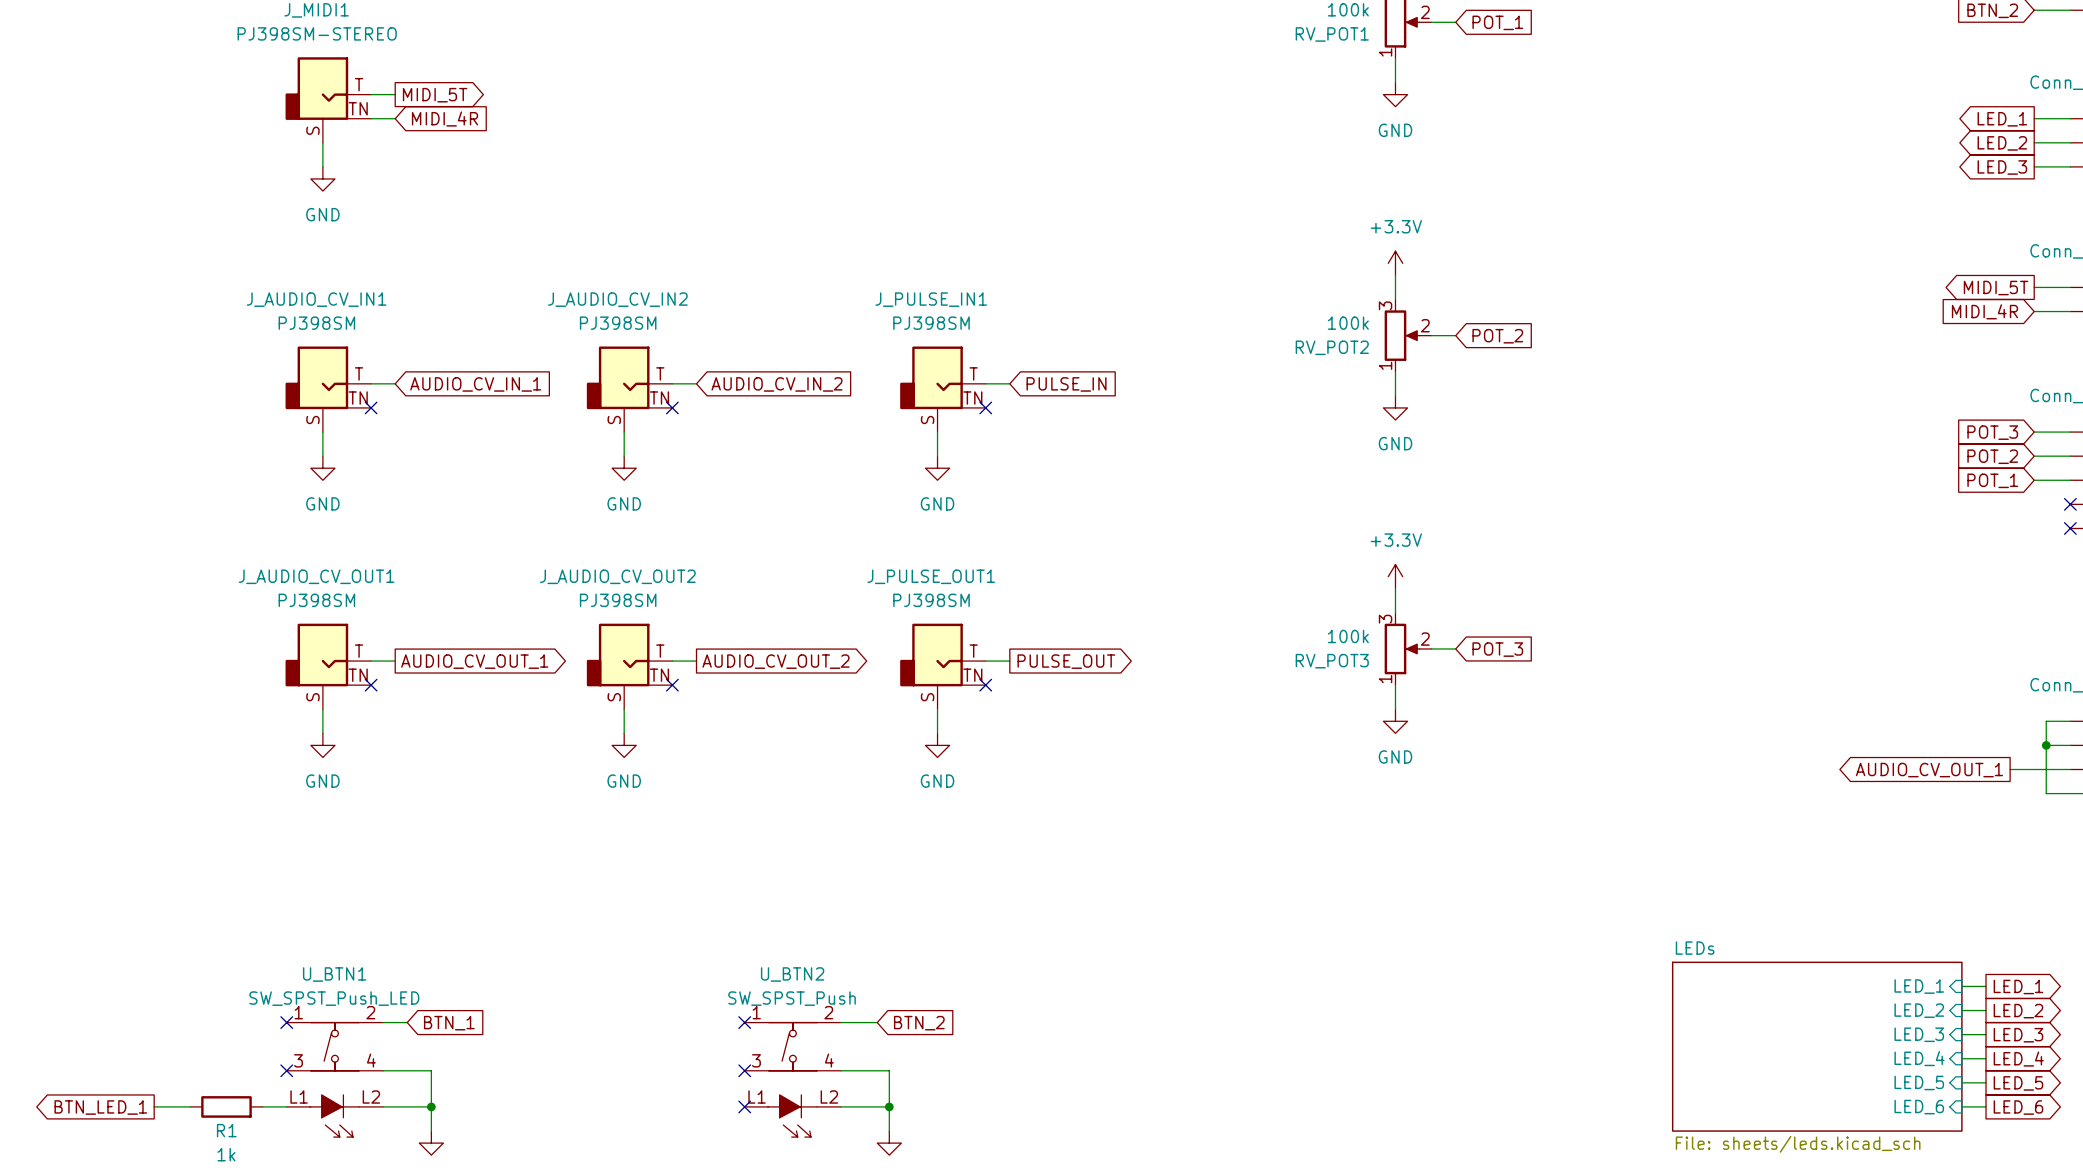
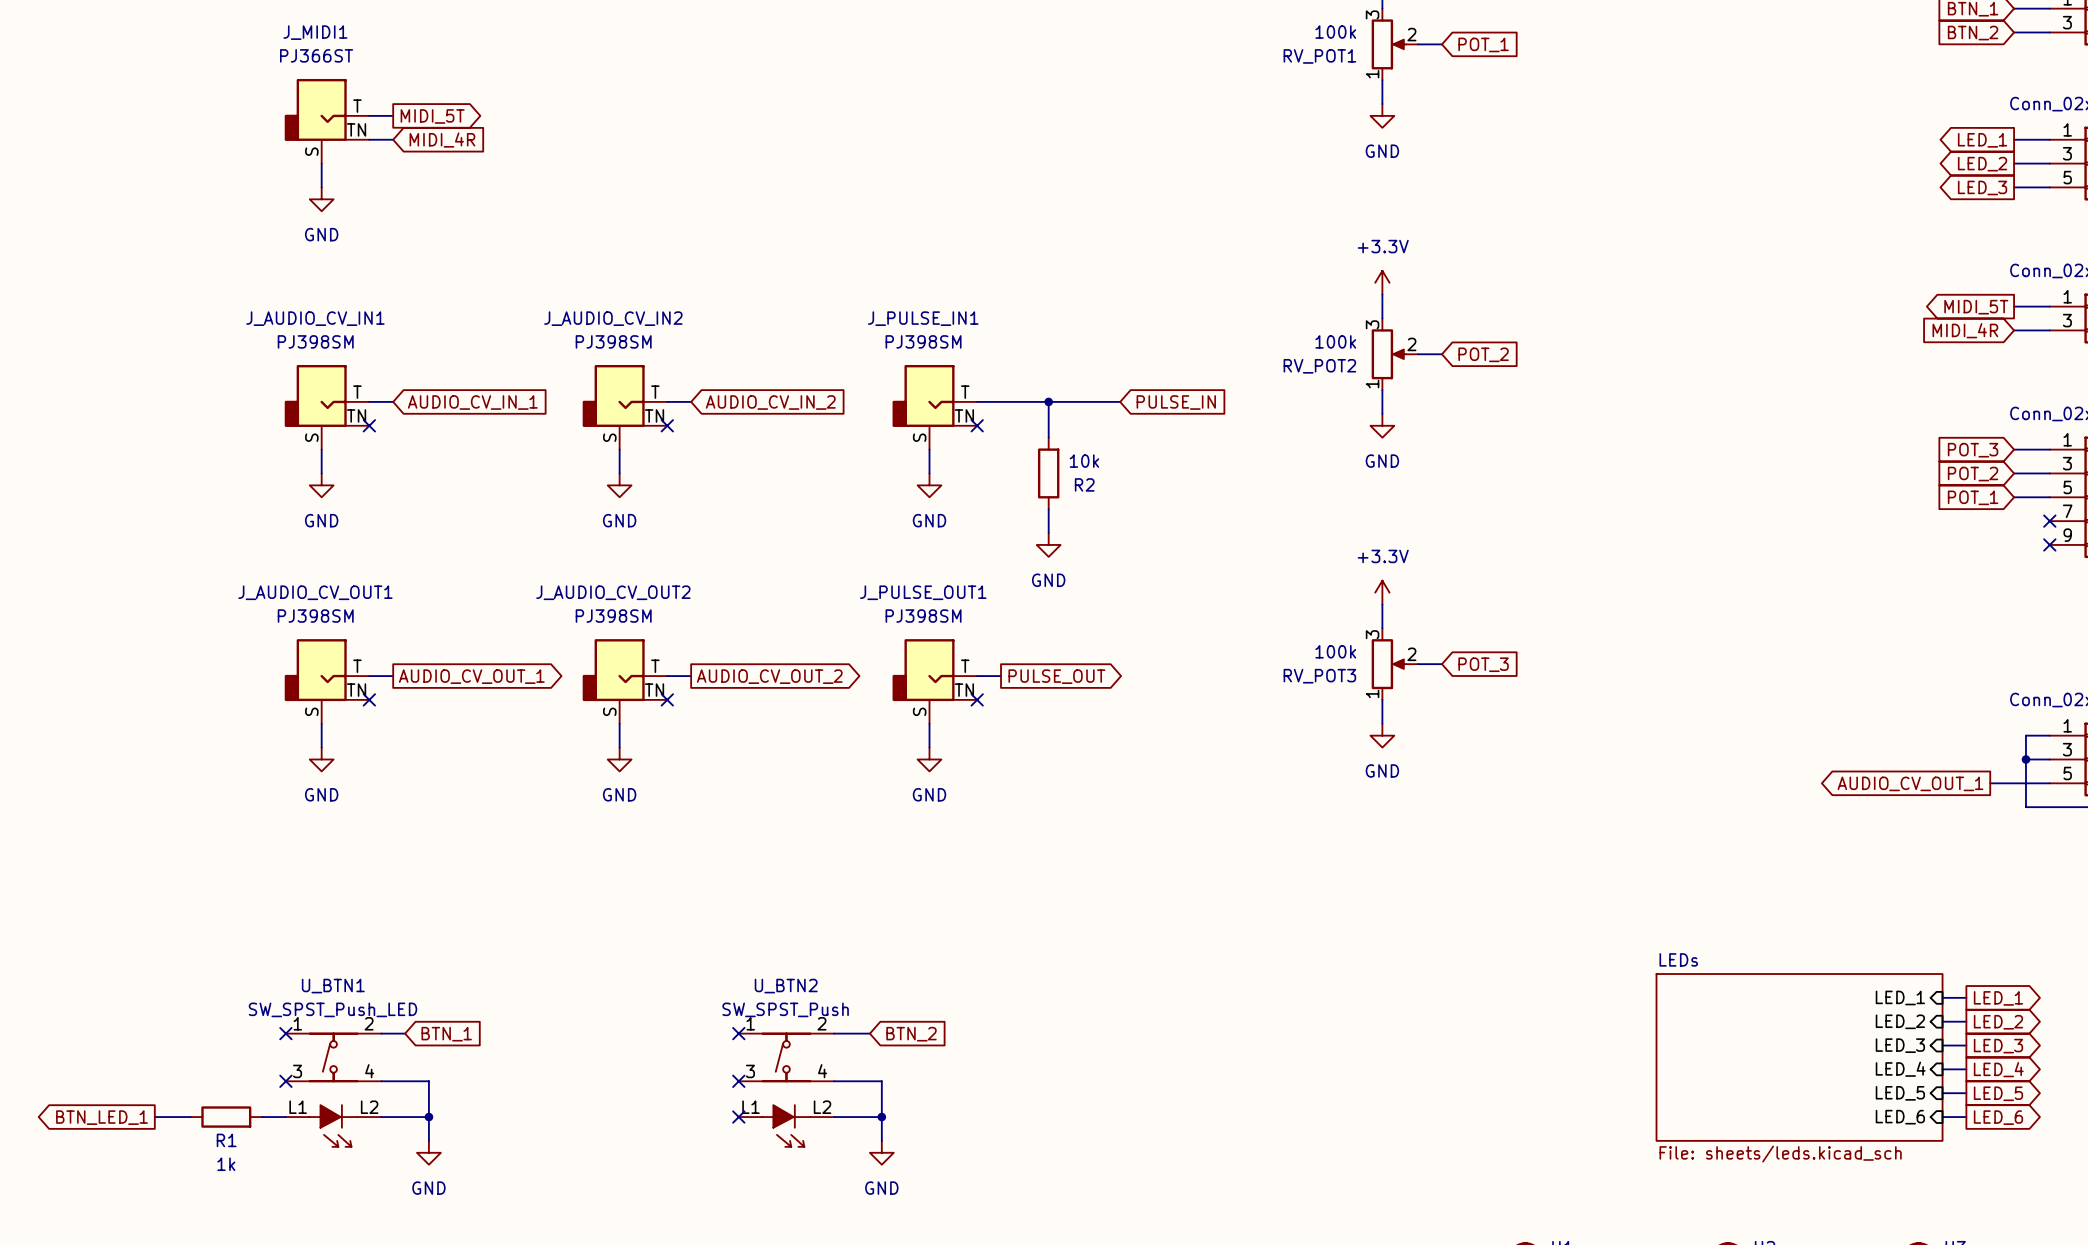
J_MIDI1 value: PJ398SM-STEREO (317, 33) -> PJ366ST (316, 55)
wire: none -> (1001, 401) (1120, 401)
wire: none -> (1048, 401) (1048, 437)
junction: none -> (1048, 401)
global label position: PULSE_IN (1066, 384) -> PULSE_IN (1176, 402)
R2: none -> 10k (1048, 473)
wire: none -> (1048, 509) (1048, 533)
power symbol: none -> GND (1048, 544)

